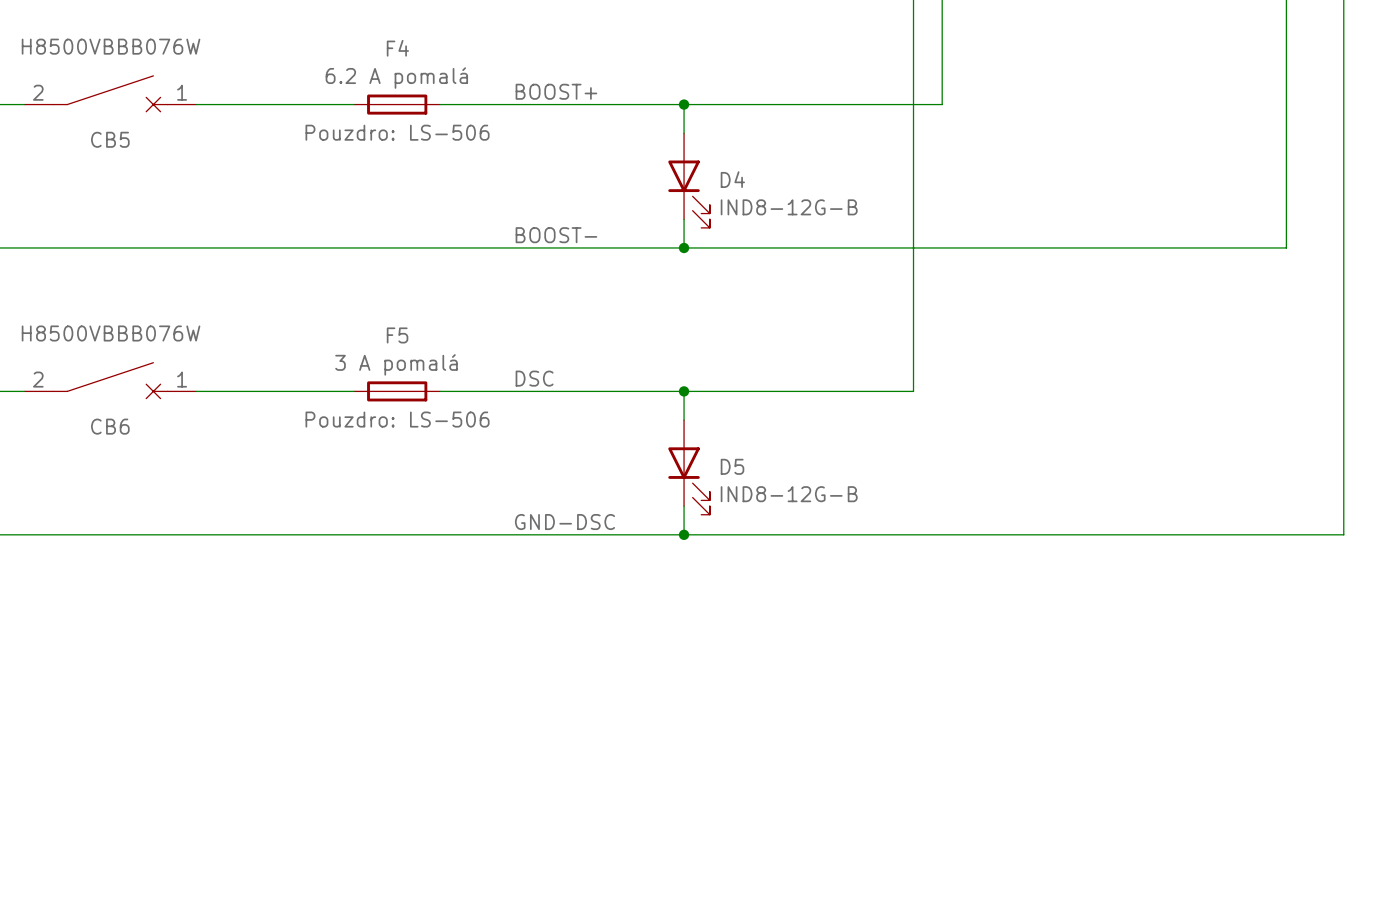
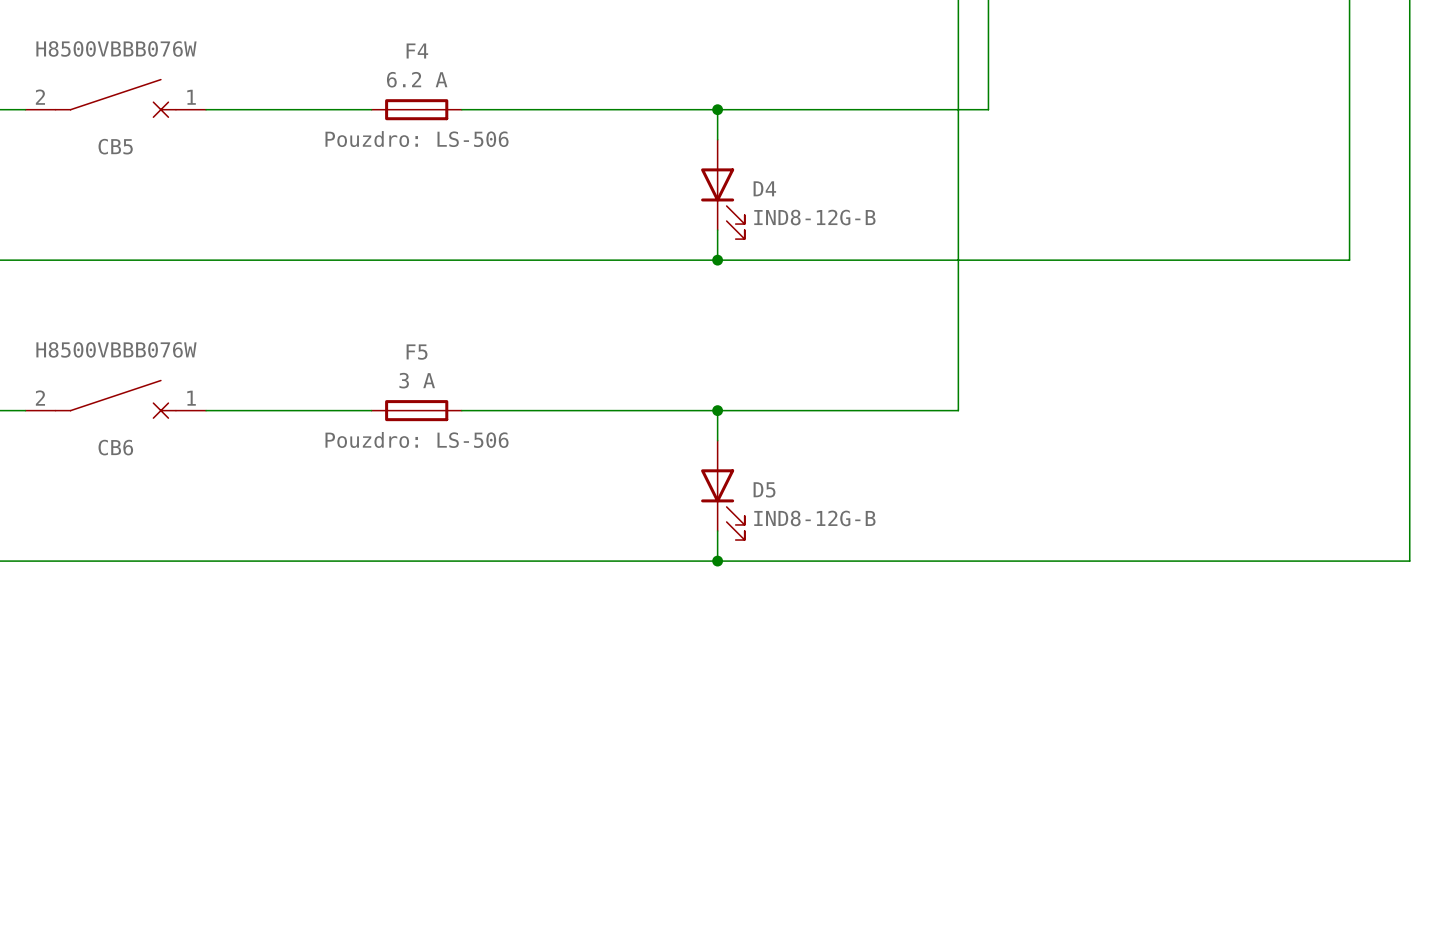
F4 value: 6.2 A pomalá (396, 78) -> 6.2 A (417, 79)
label: BOOST+ (556, 91) -> none
label: BOOST- (556, 235) -> none
F5 value: 3 A pomalá (396, 364) -> 3 A (417, 380)
label: DSC (534, 378) -> none
label: GND-DSC (564, 522) -> none

